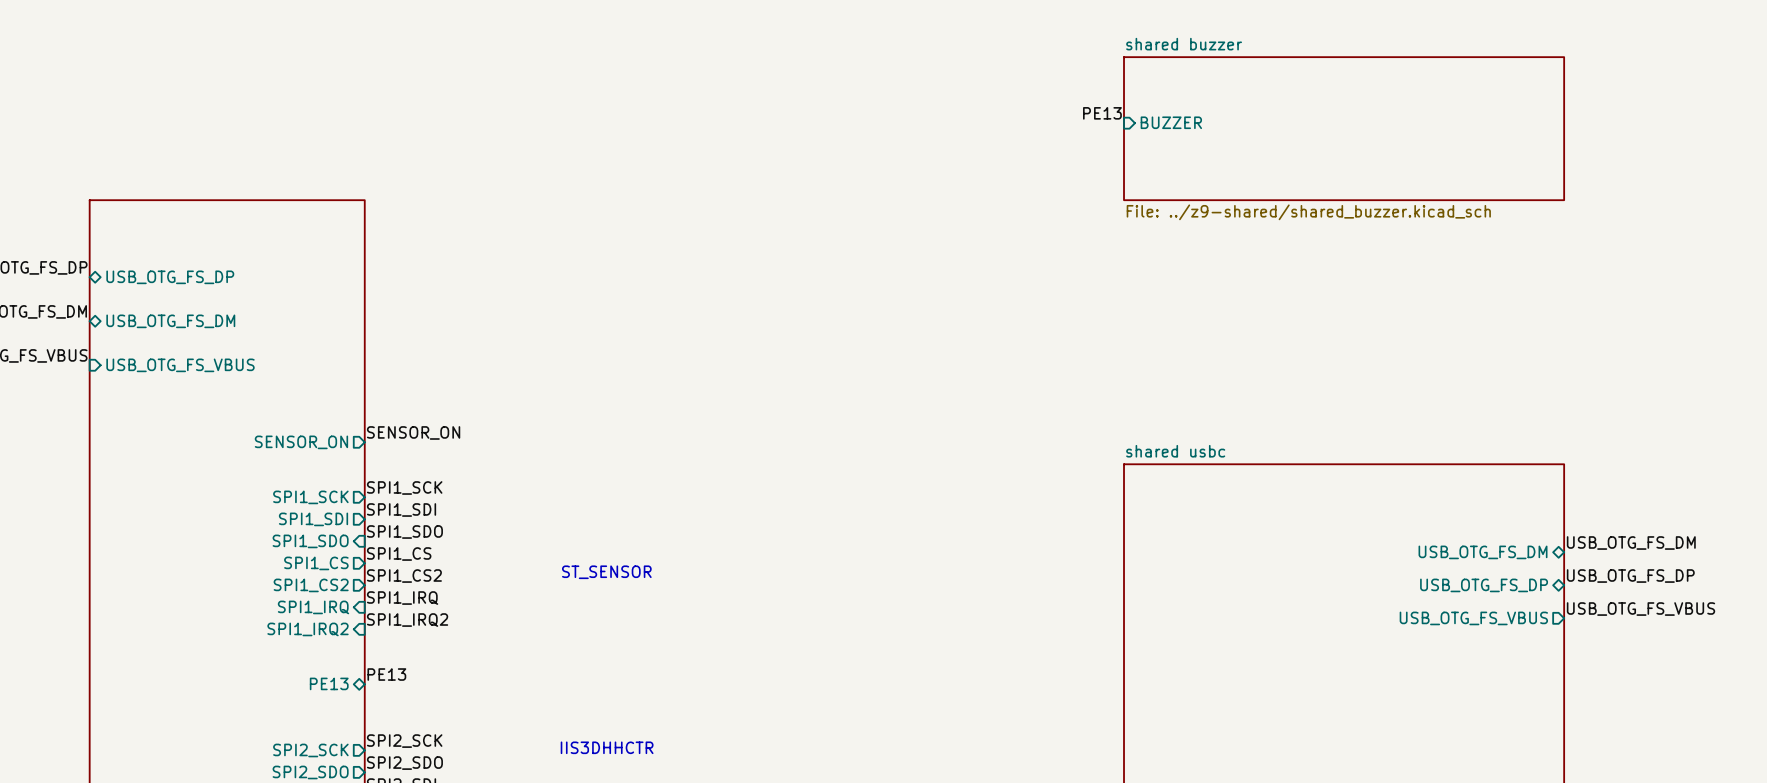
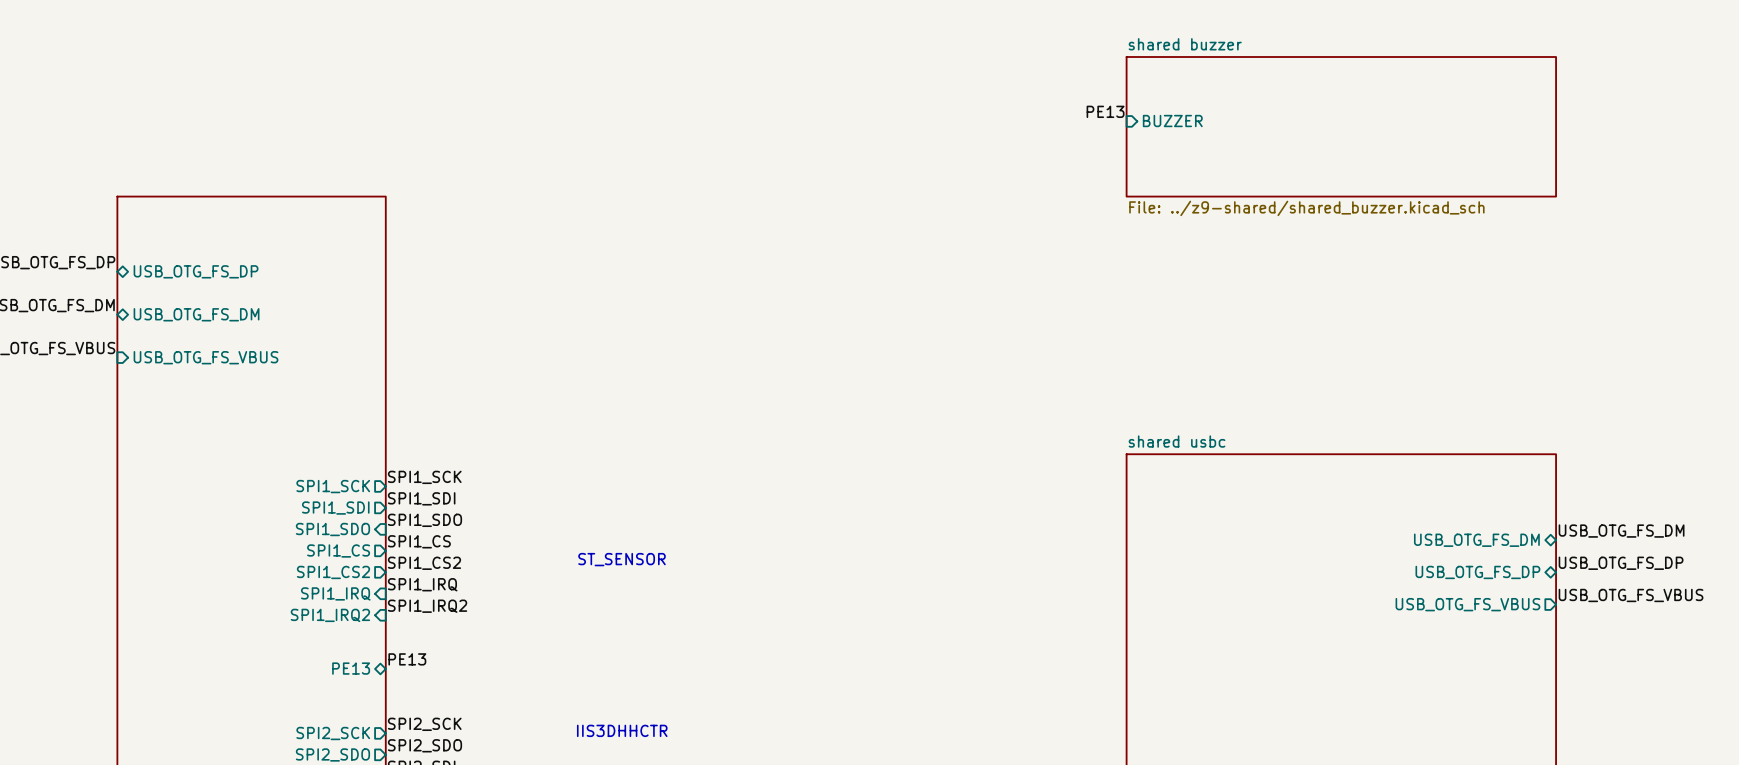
label: SENSOR_ON (413, 432) -> none
sheet pin: SENSOR_ON (301, 442) -> none

